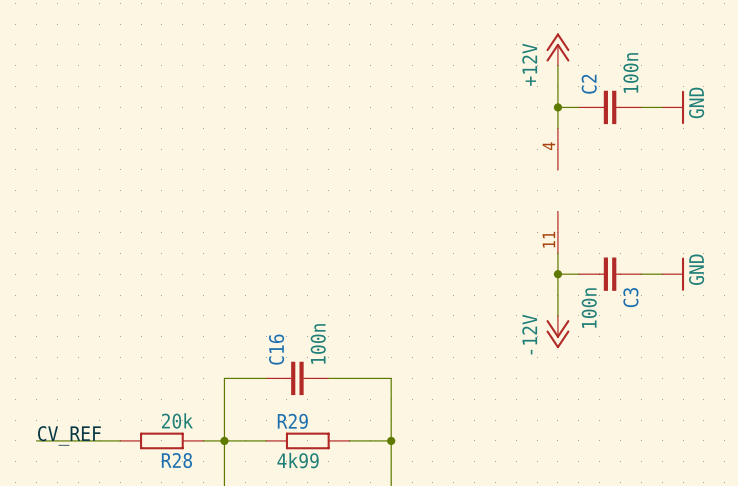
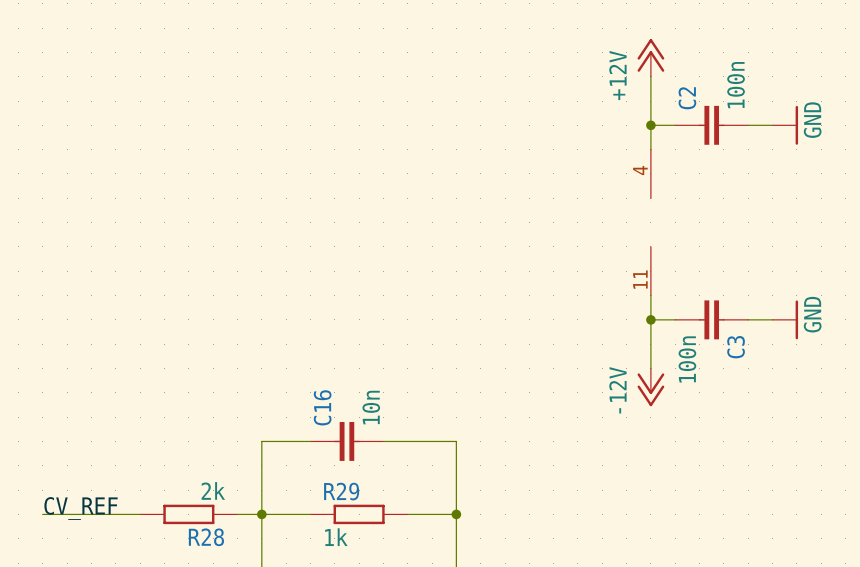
C16 value: 100n (318, 343) -> 10n (371, 407)
R28 value: 20k (177, 420) -> 2k (213, 490)
R29 value: 4k99 (298, 460) -> 1k (336, 537)

